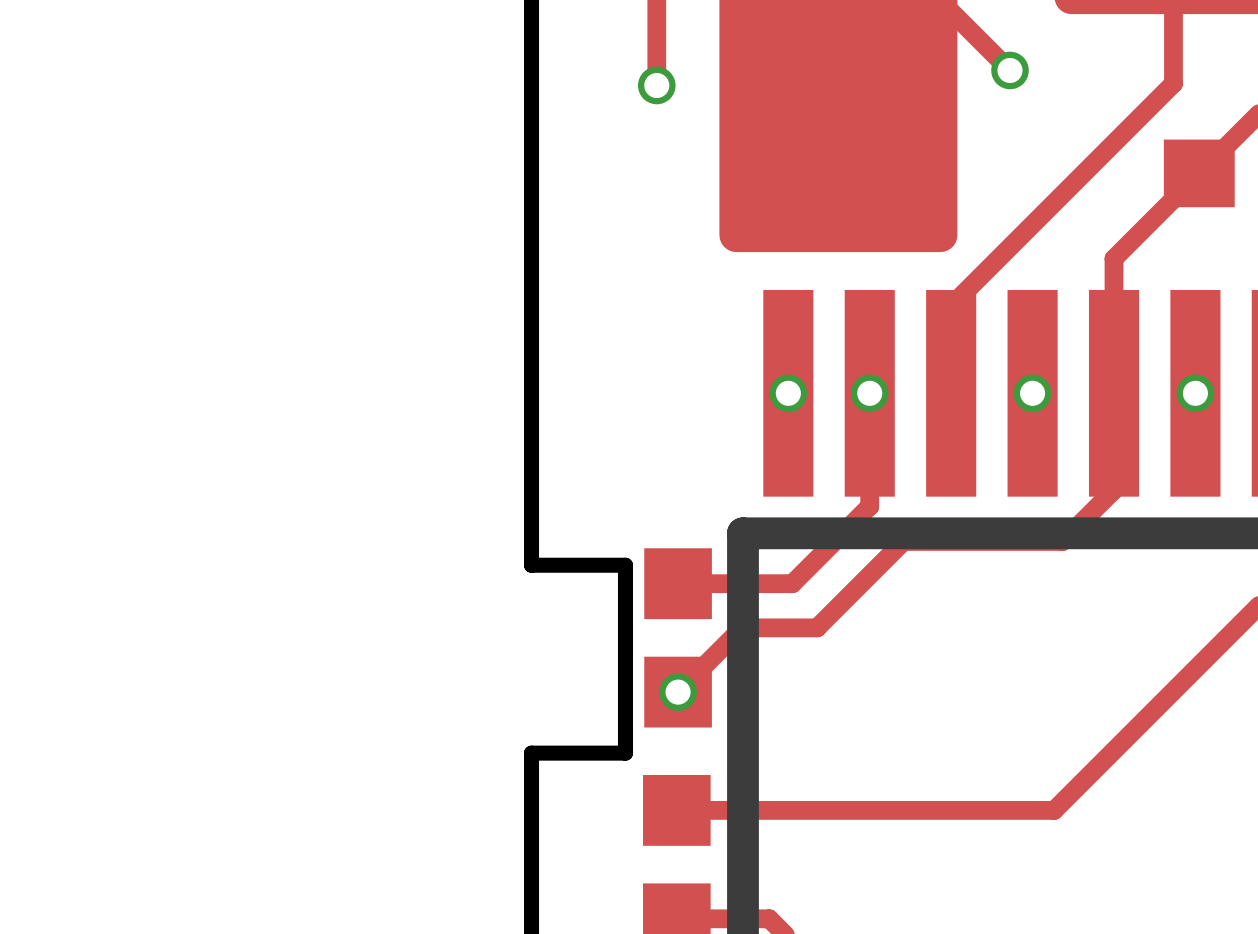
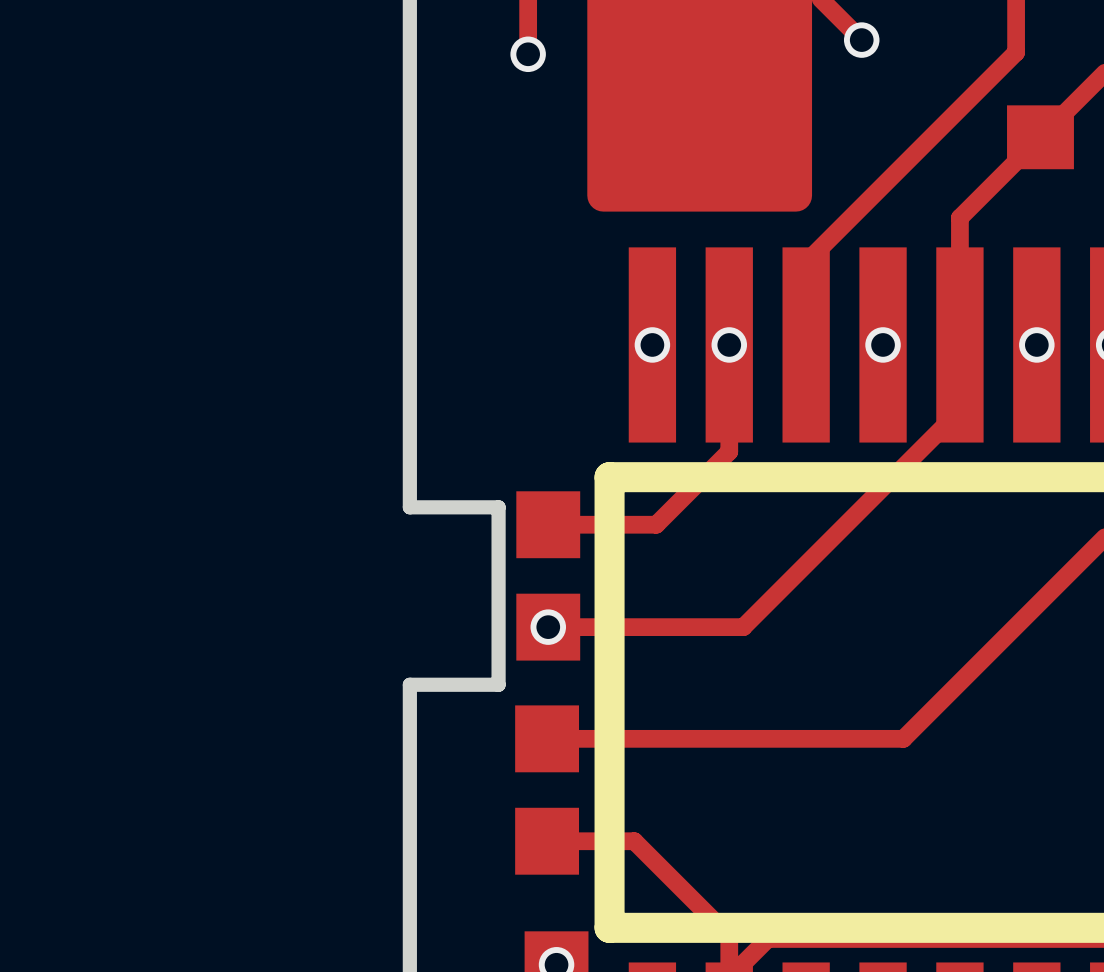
track: (1114, 462) (1114, 490) (1062, 541) (903, 541) (817, 627) (742, 627) (678, 692) -> (959, 410) (743, 627) (548, 627)

